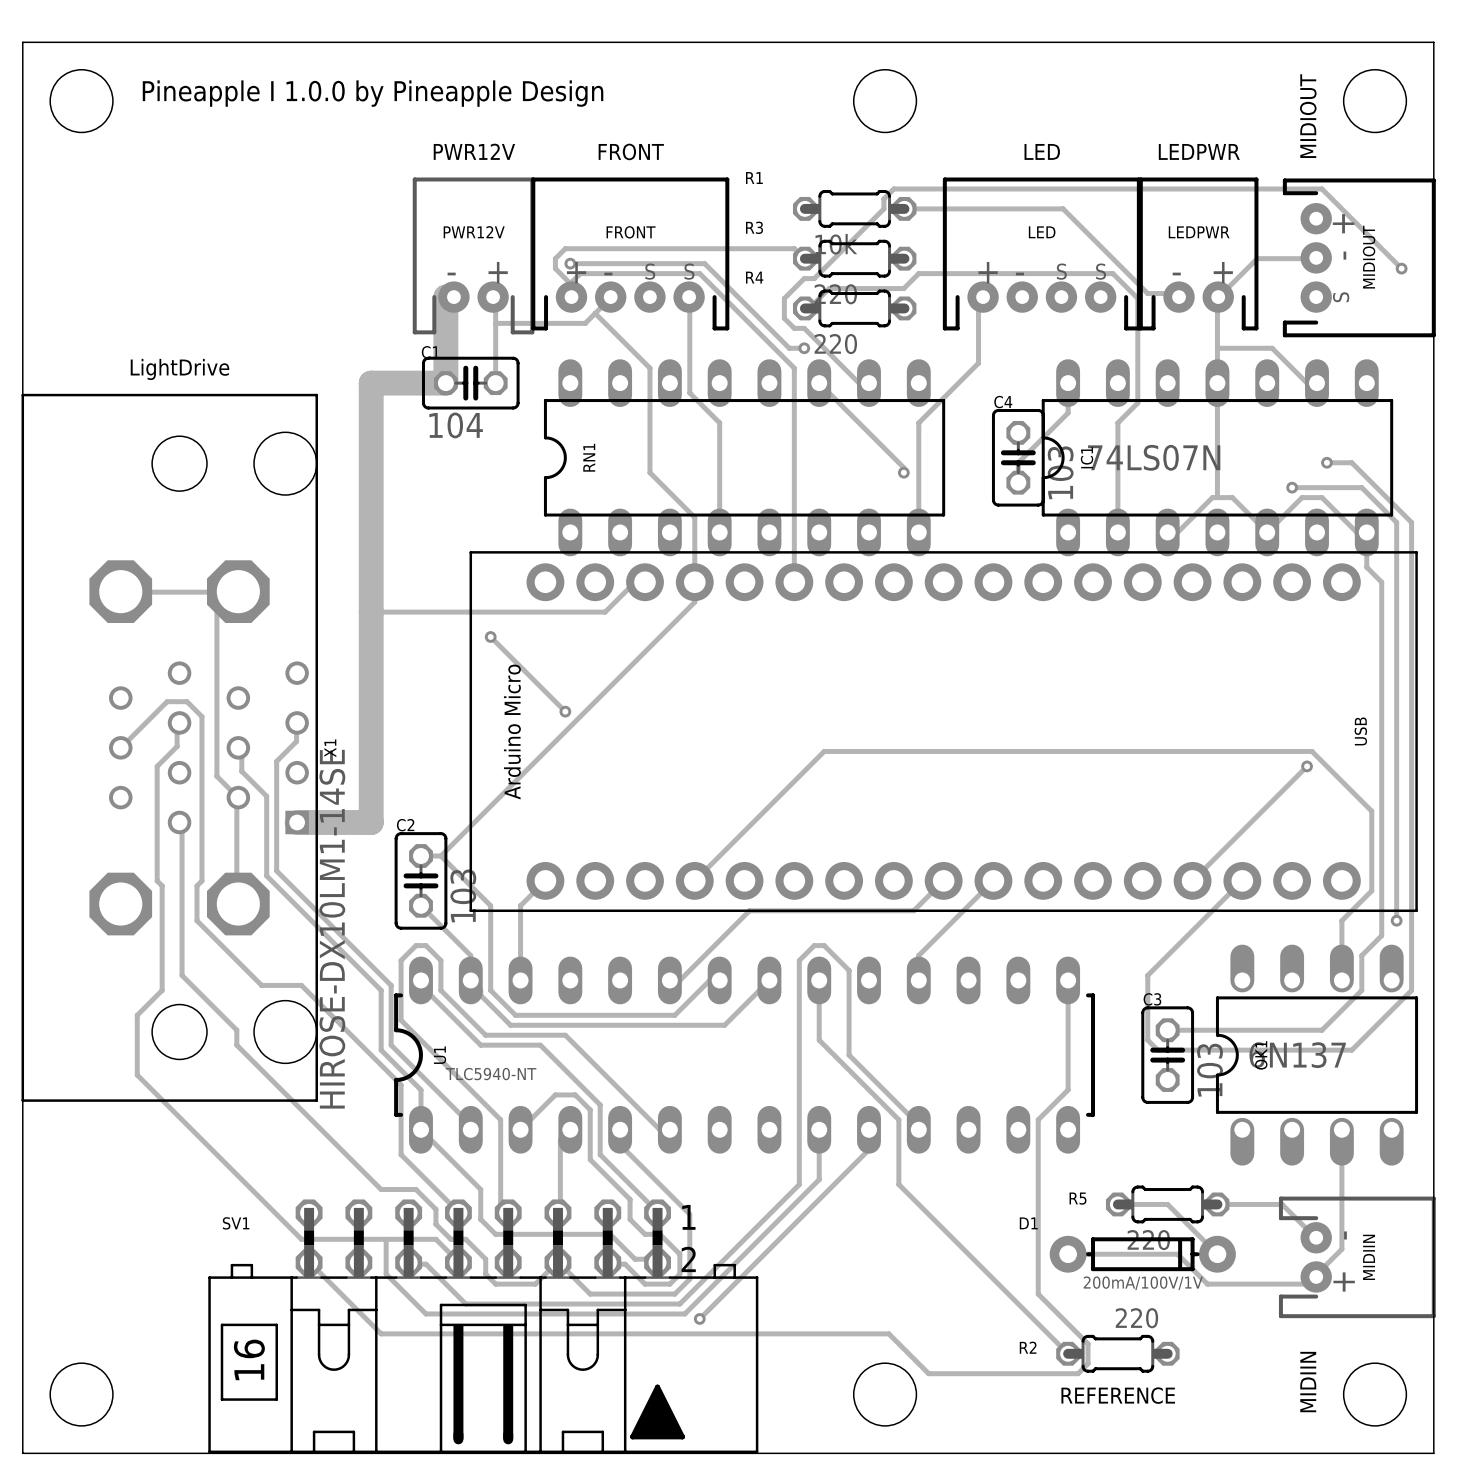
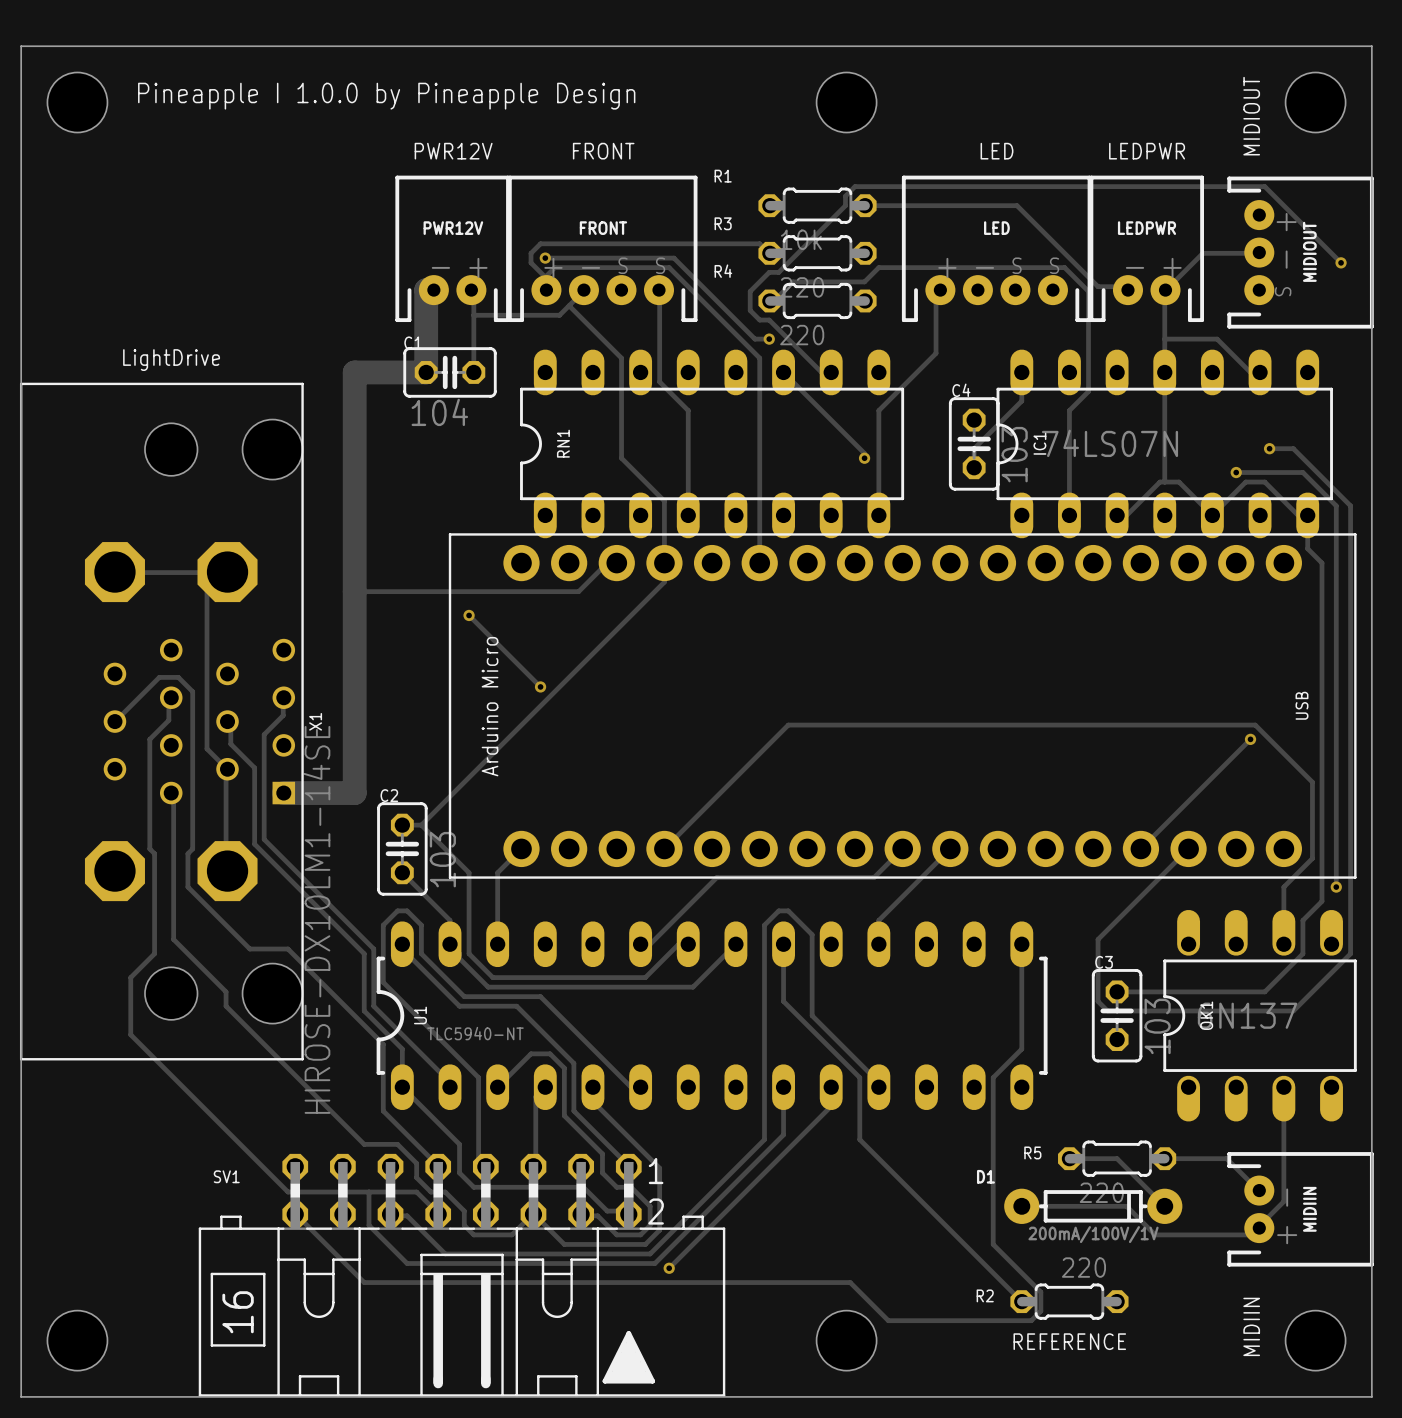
PWR12V footprint: [412, 177, 535, 335] -> [395, 175, 510, 323]
MIDIIN footprint: [1278, 1196, 1436, 1319] -> [1227, 1152, 1374, 1267]

